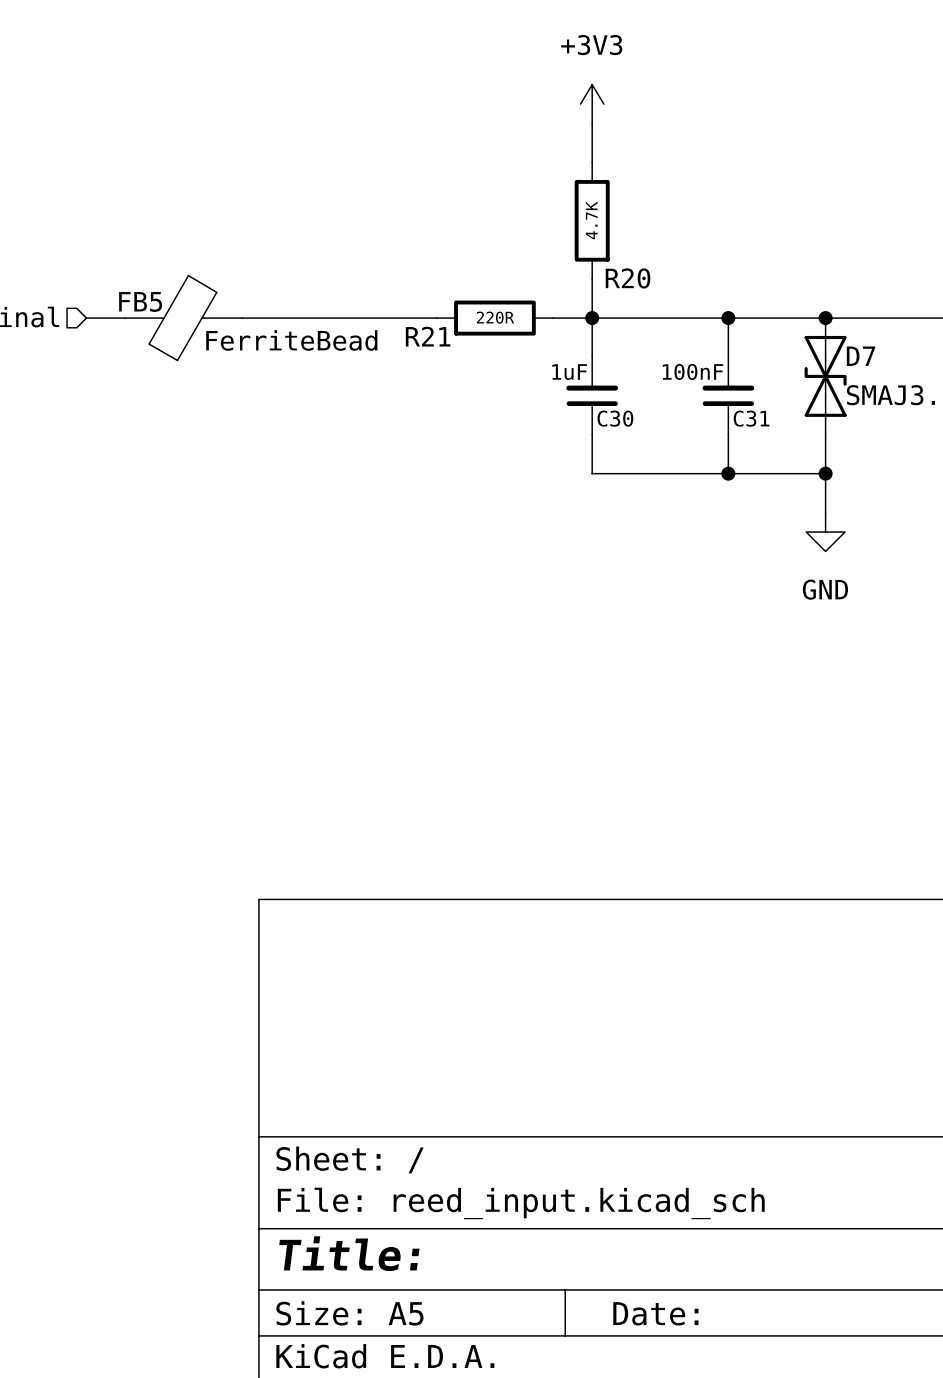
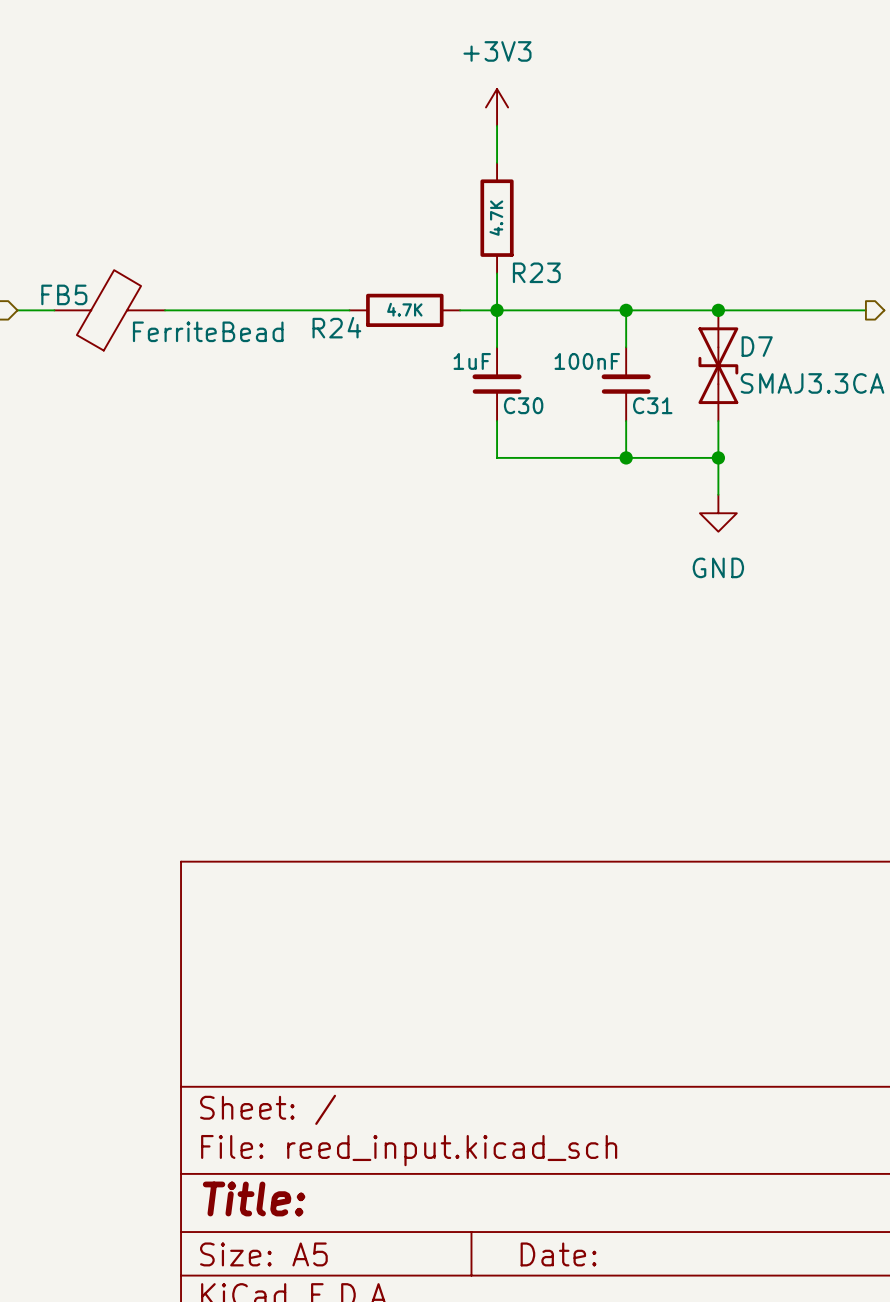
R20 name: R20 (628, 278) -> R23 (536, 272)
R21 value: 220R (495, 317) -> 4.7K (404, 309)
R21 name: R21 (428, 336) -> R24 (336, 327)

